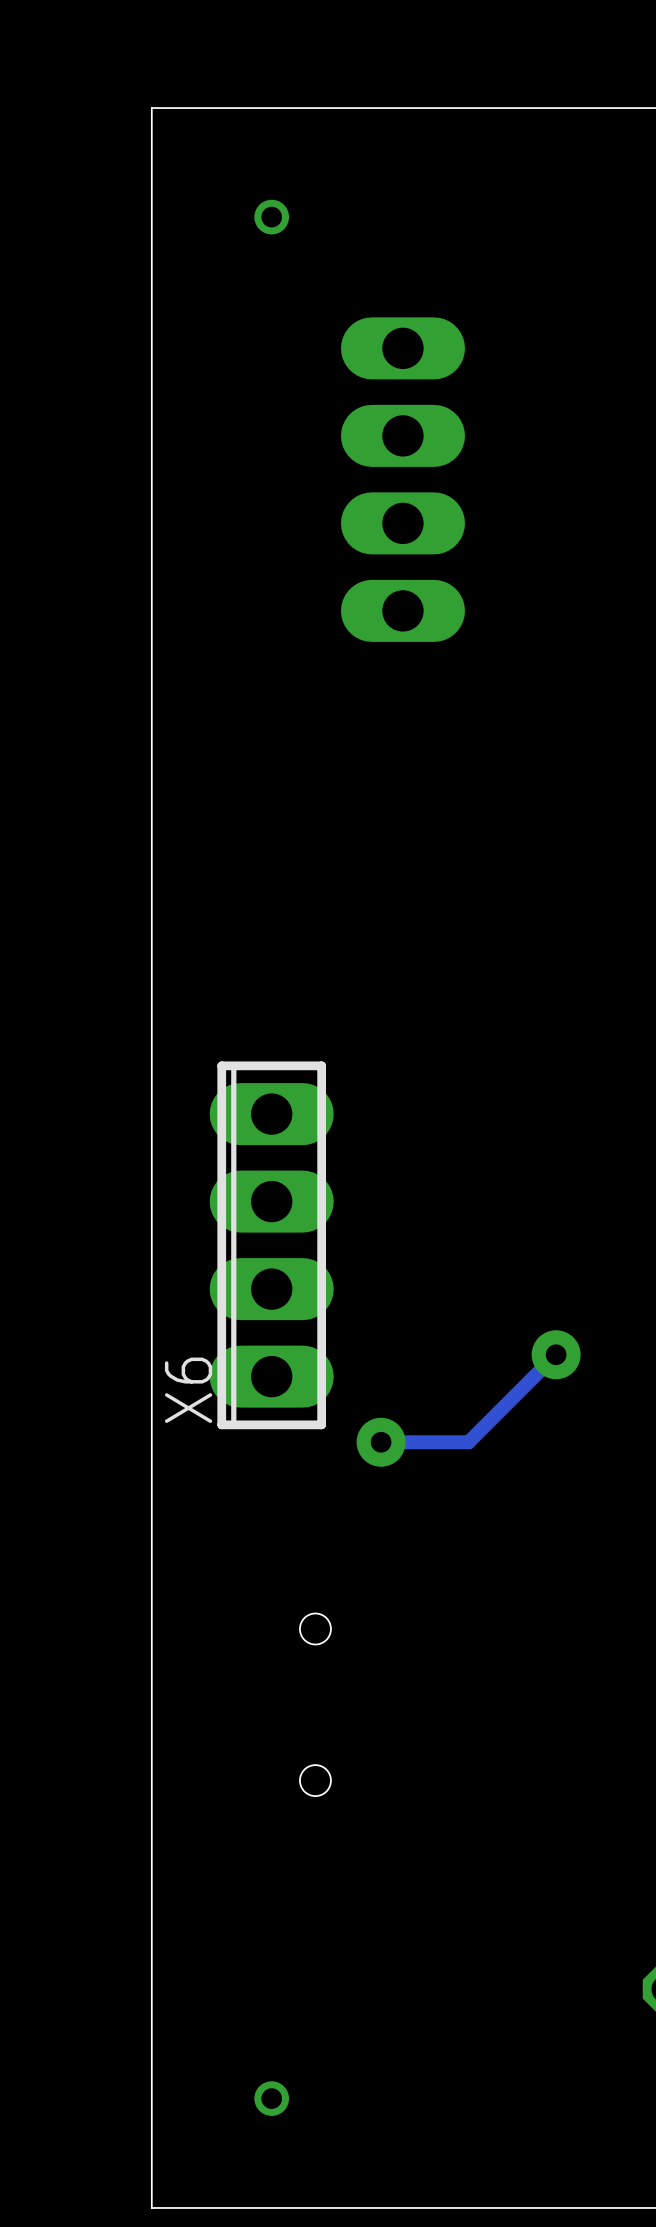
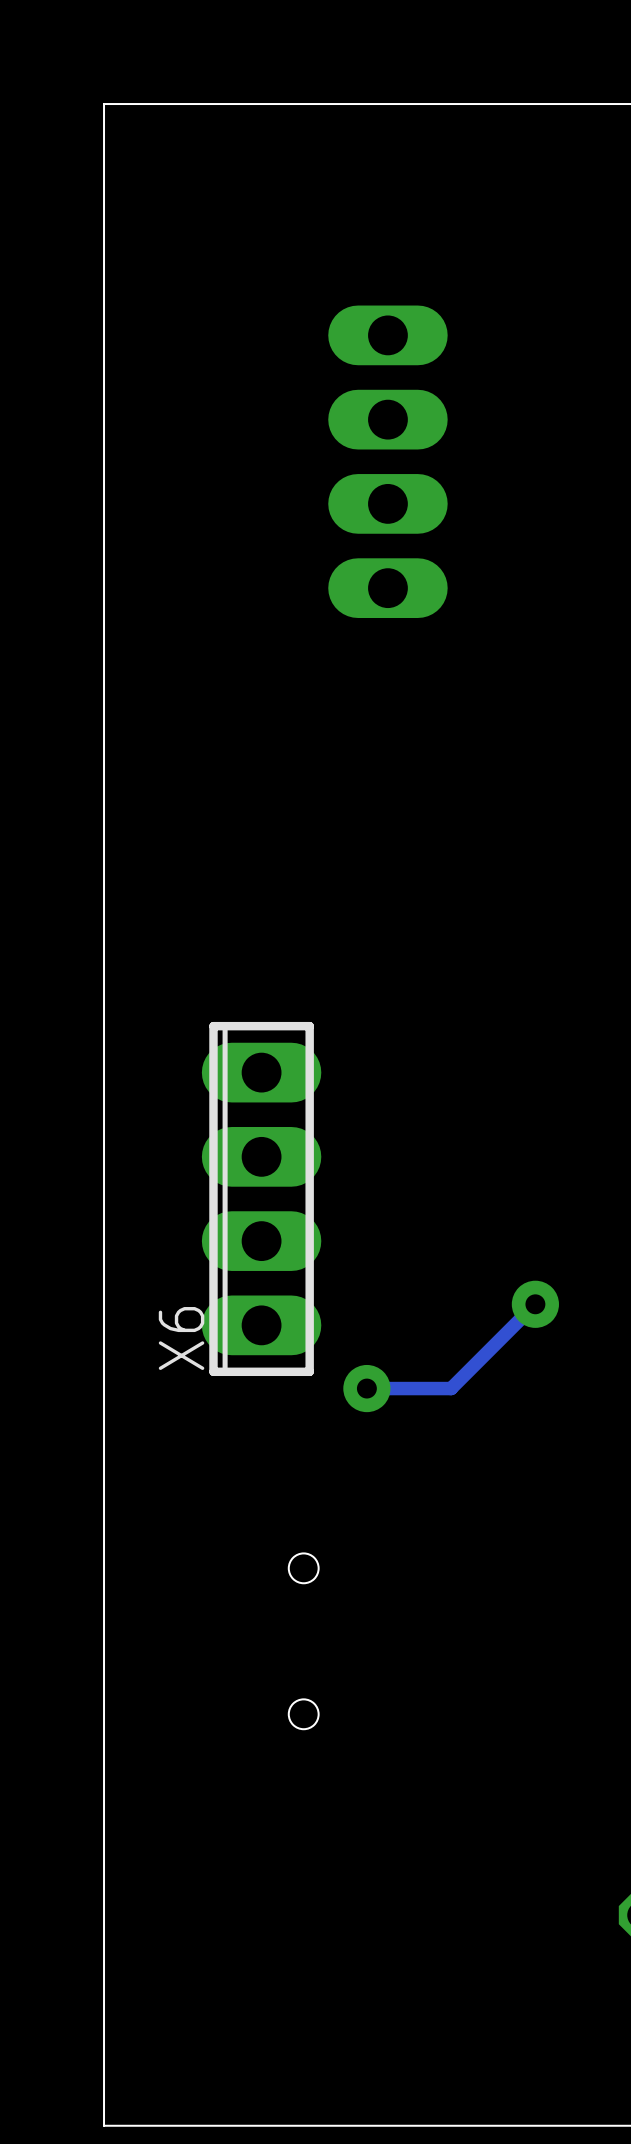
board edge: (151, 108) (151, 2207) -> (146, 104) (104, 104) (104, 2125) (146, 2125)
via: (271, 217) -> none
via: (271, 2098) -> none

